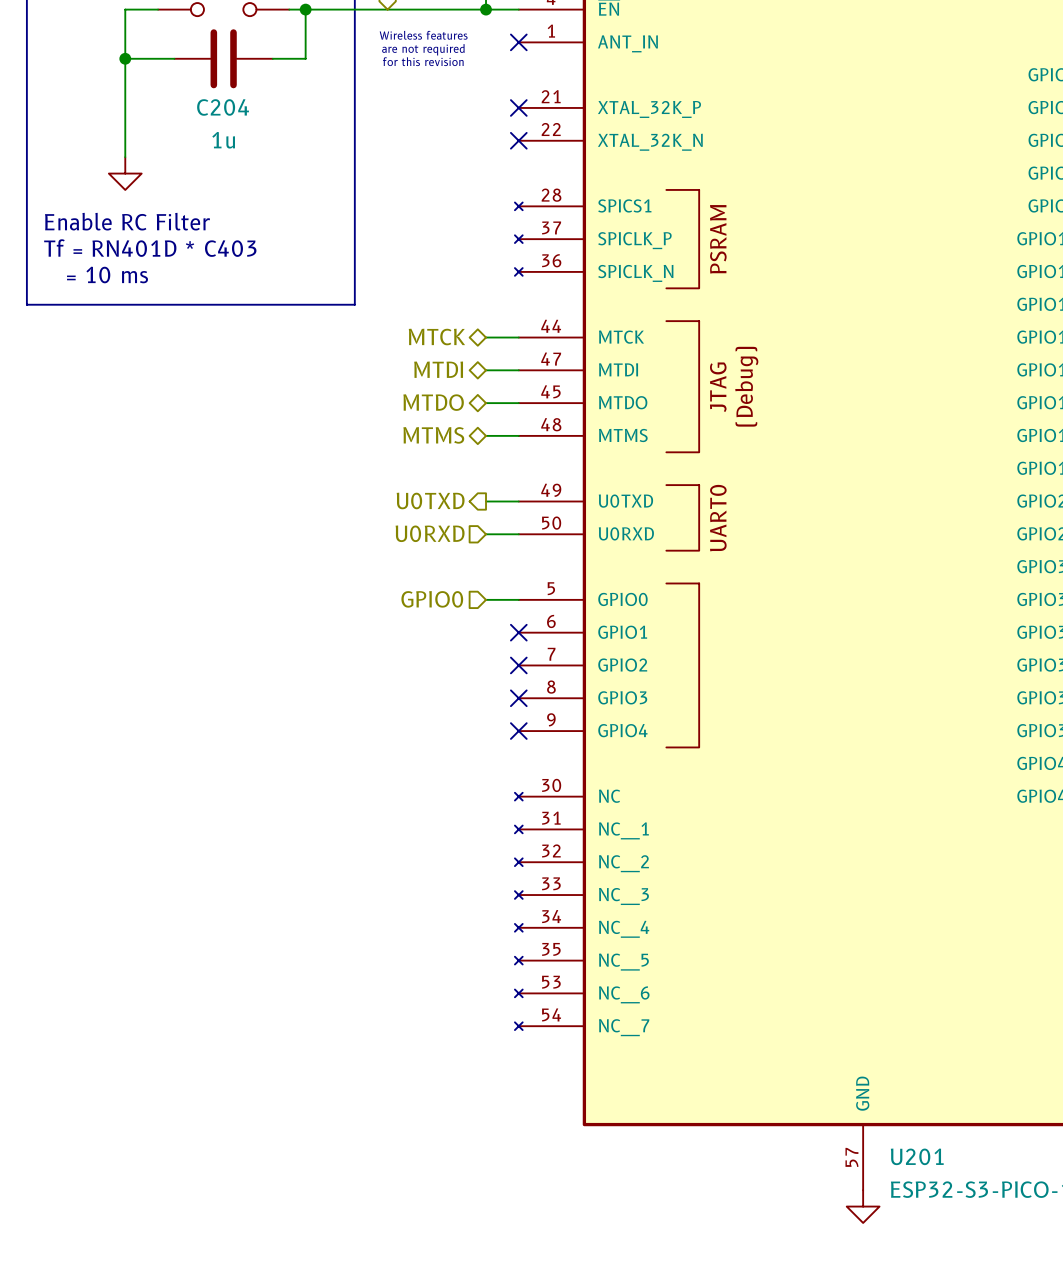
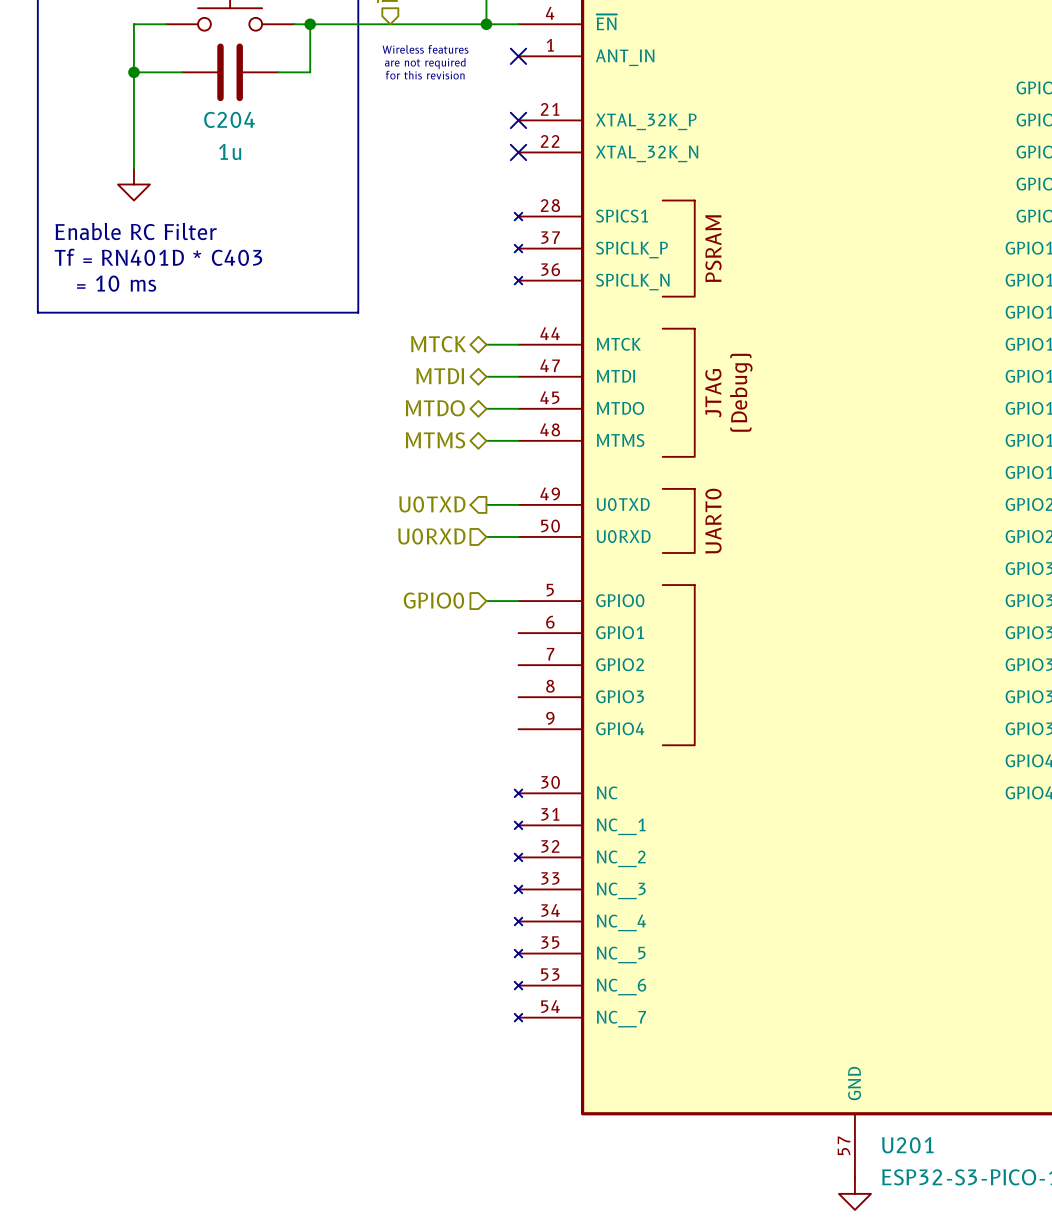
no-connect mark: (518, 632) -> none
no-connect mark: (518, 665) -> none
no-connect mark: (518, 698) -> none
no-connect mark: (518, 731) -> none

